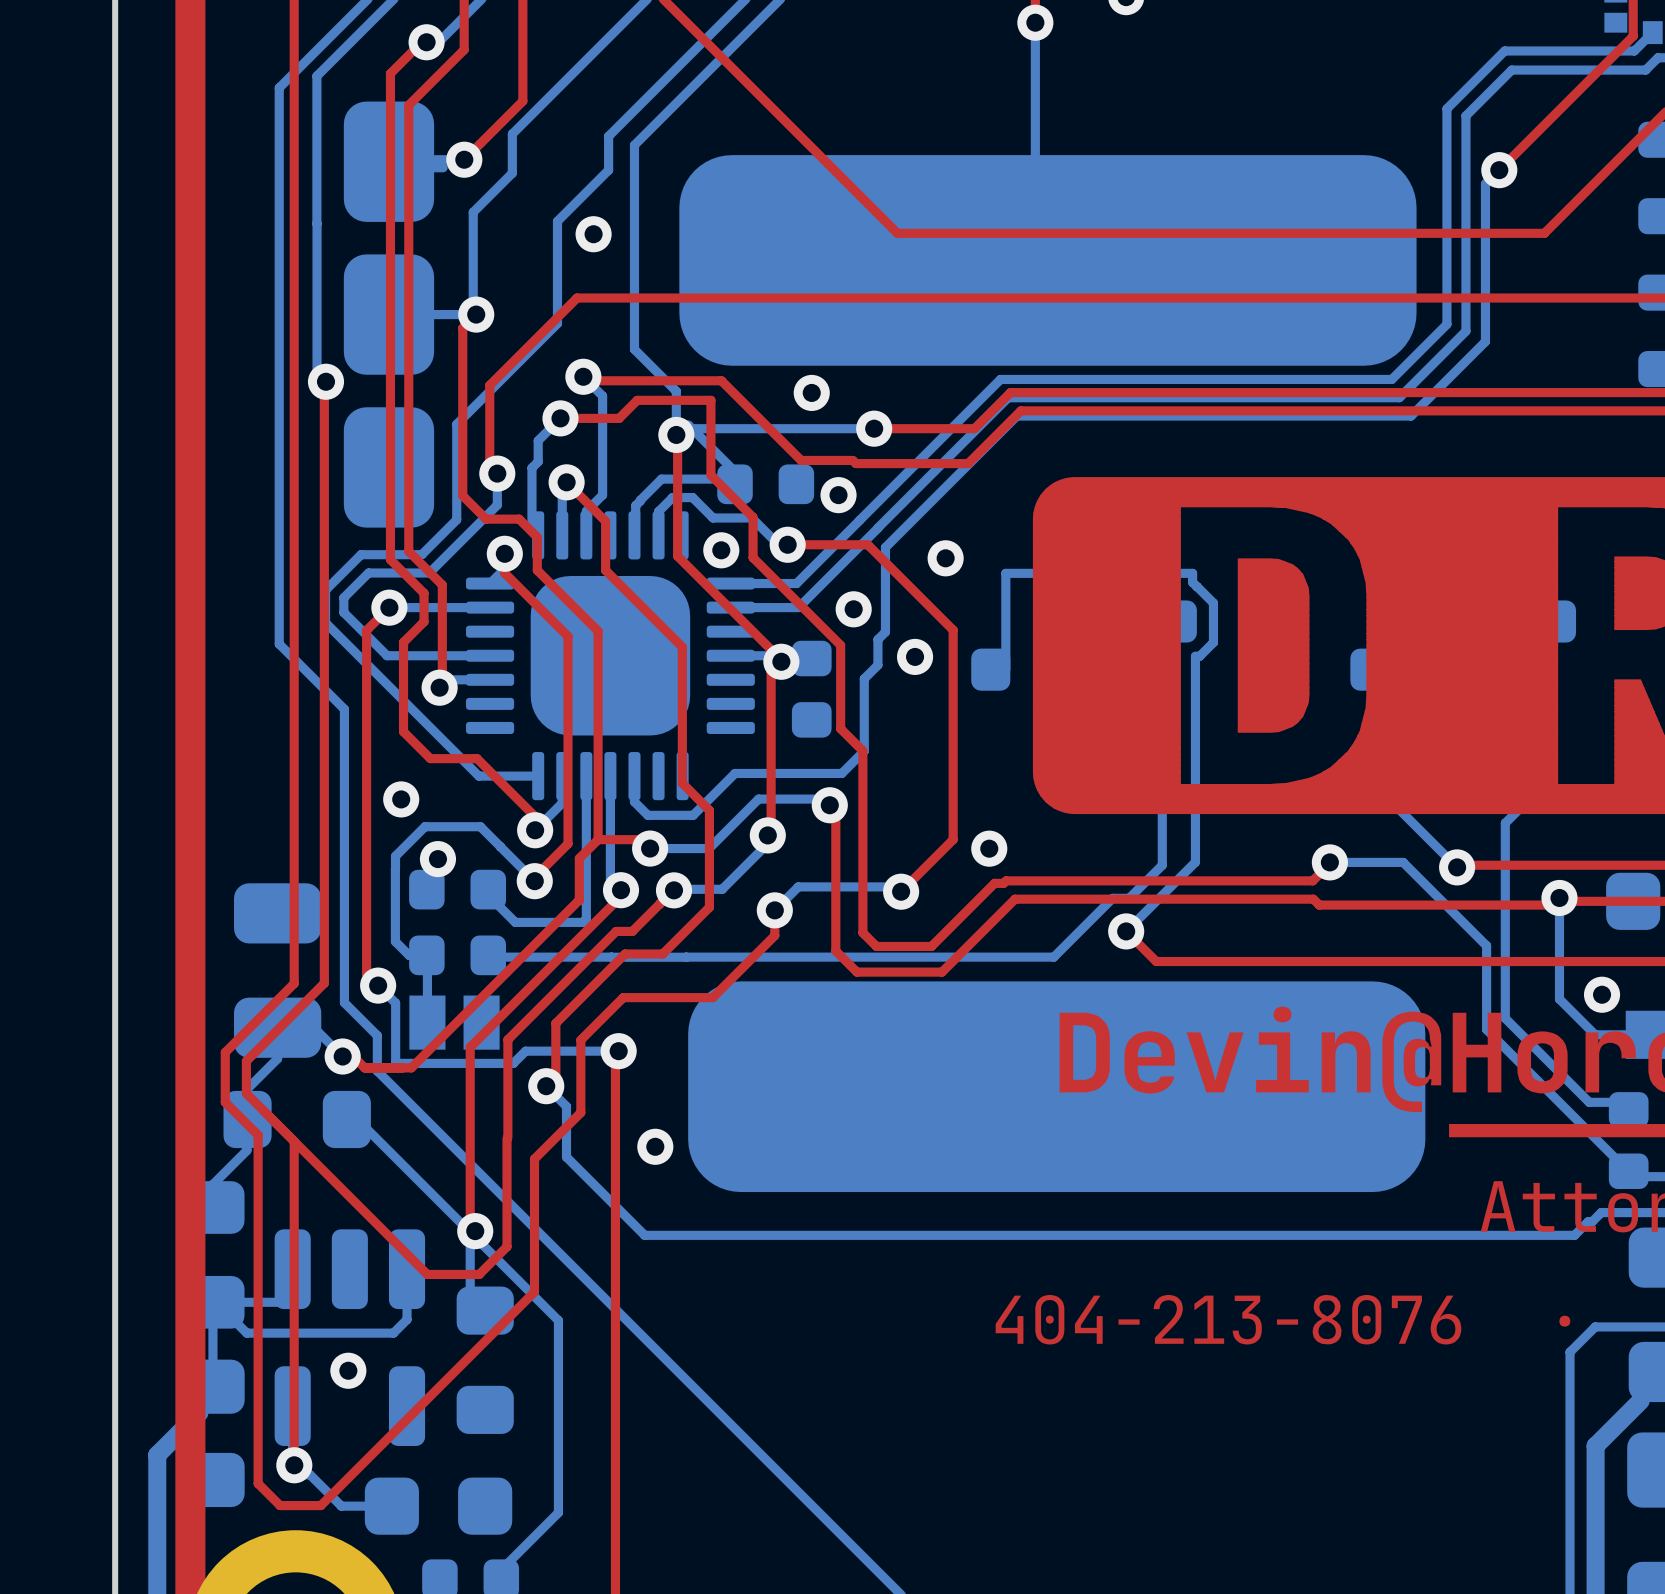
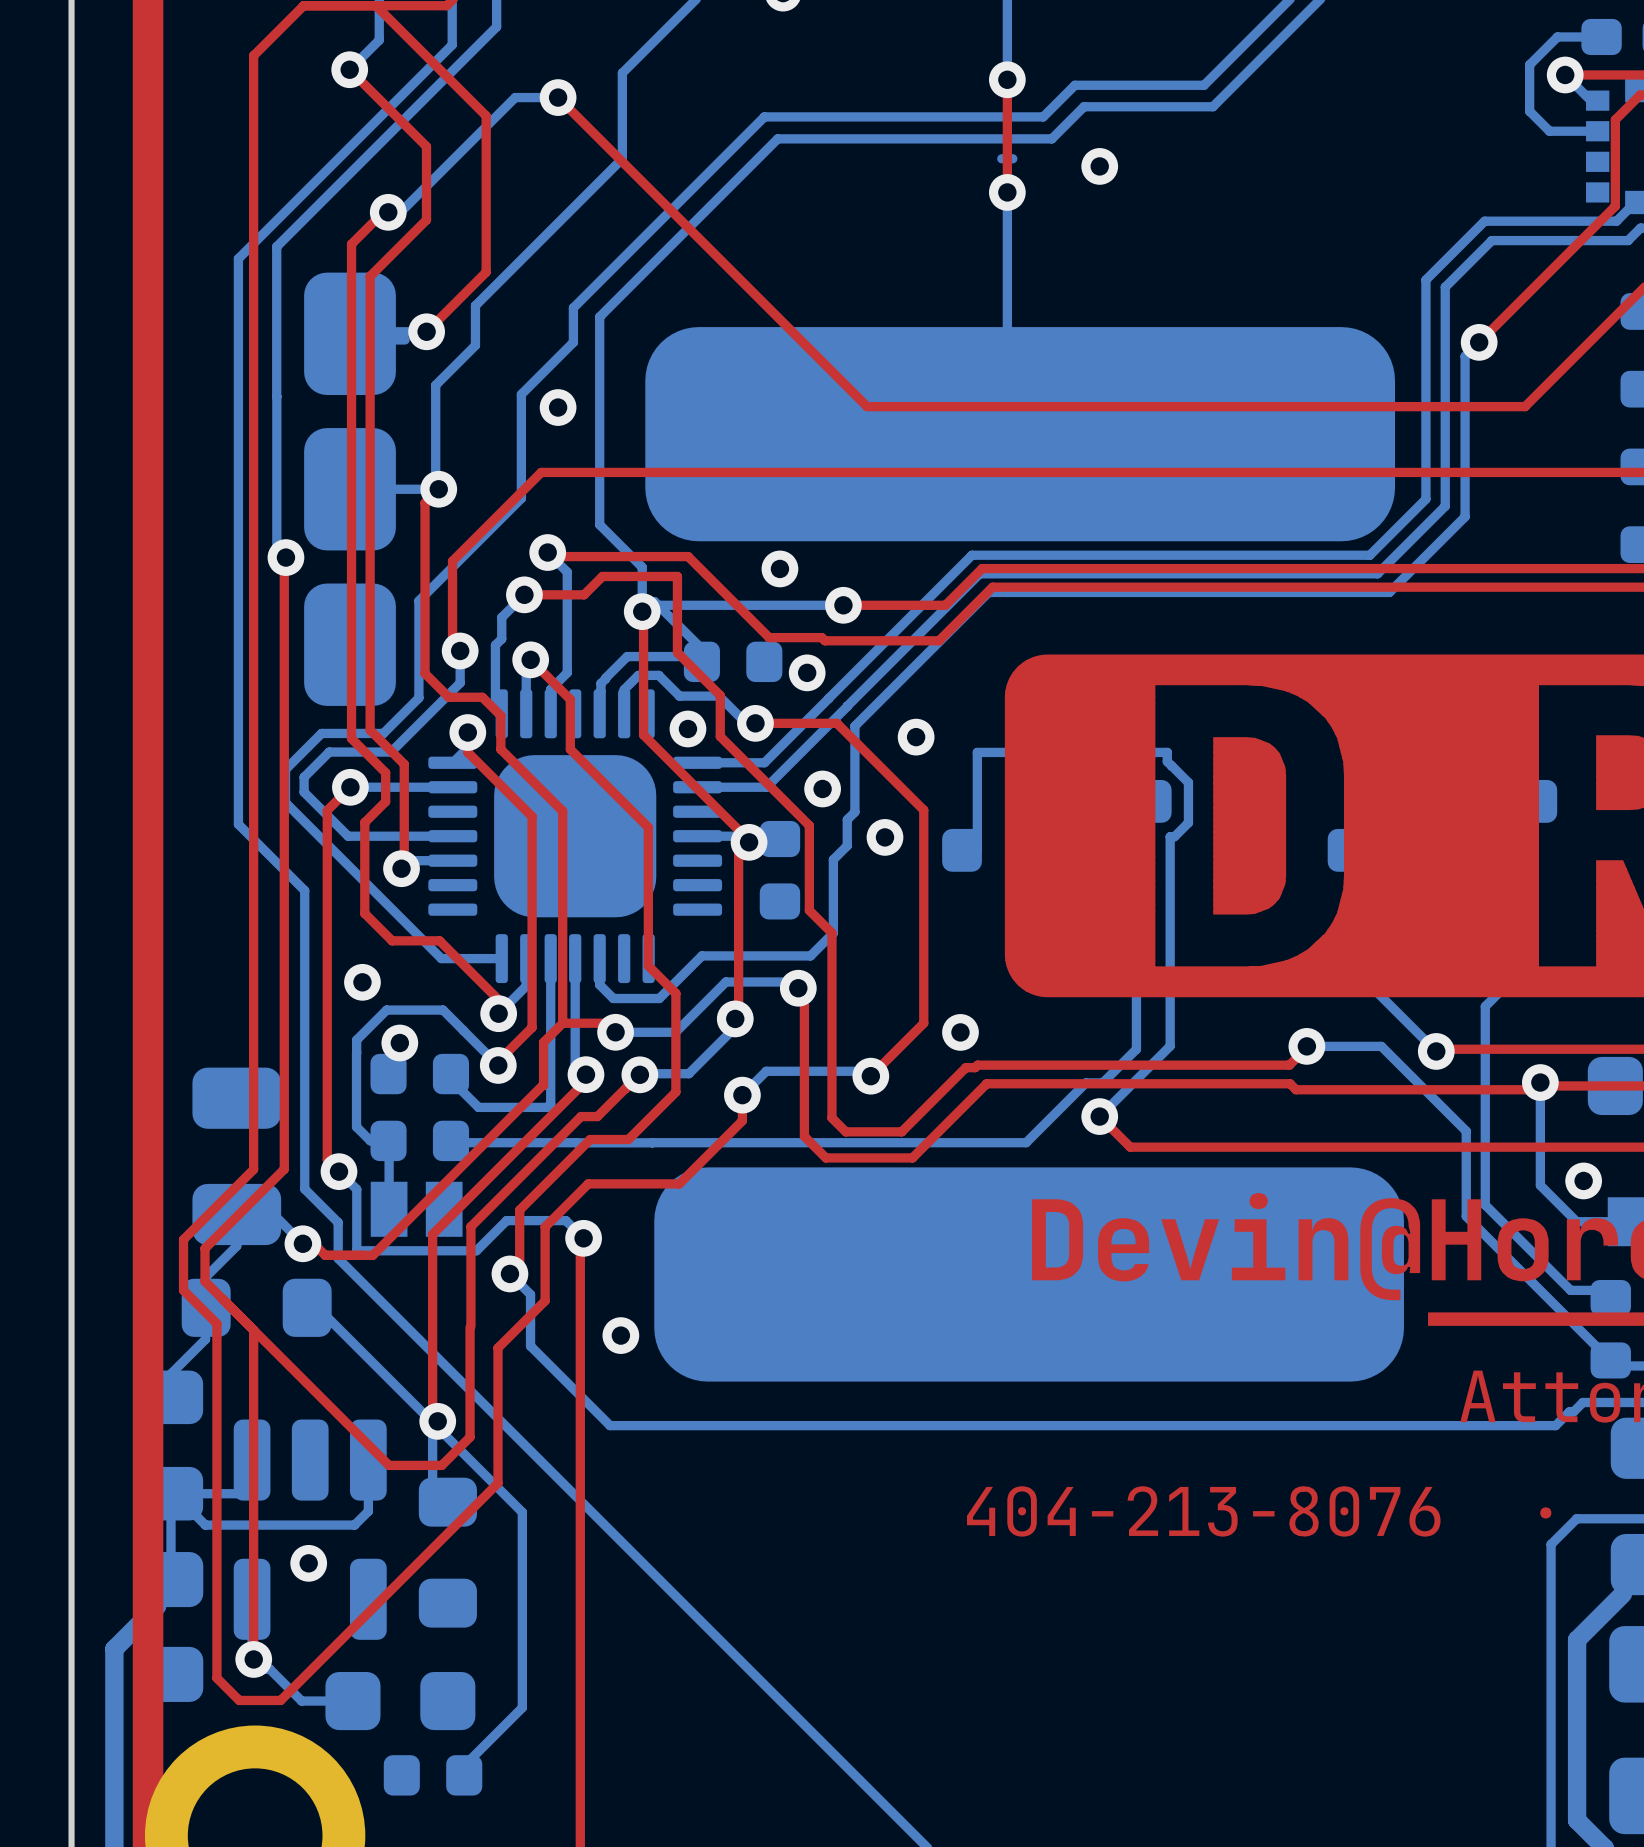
bottom track: (525, 1051) (618, 1051) -> (488, 1238) (506, 1220) (565, 1220) (583, 1238)

